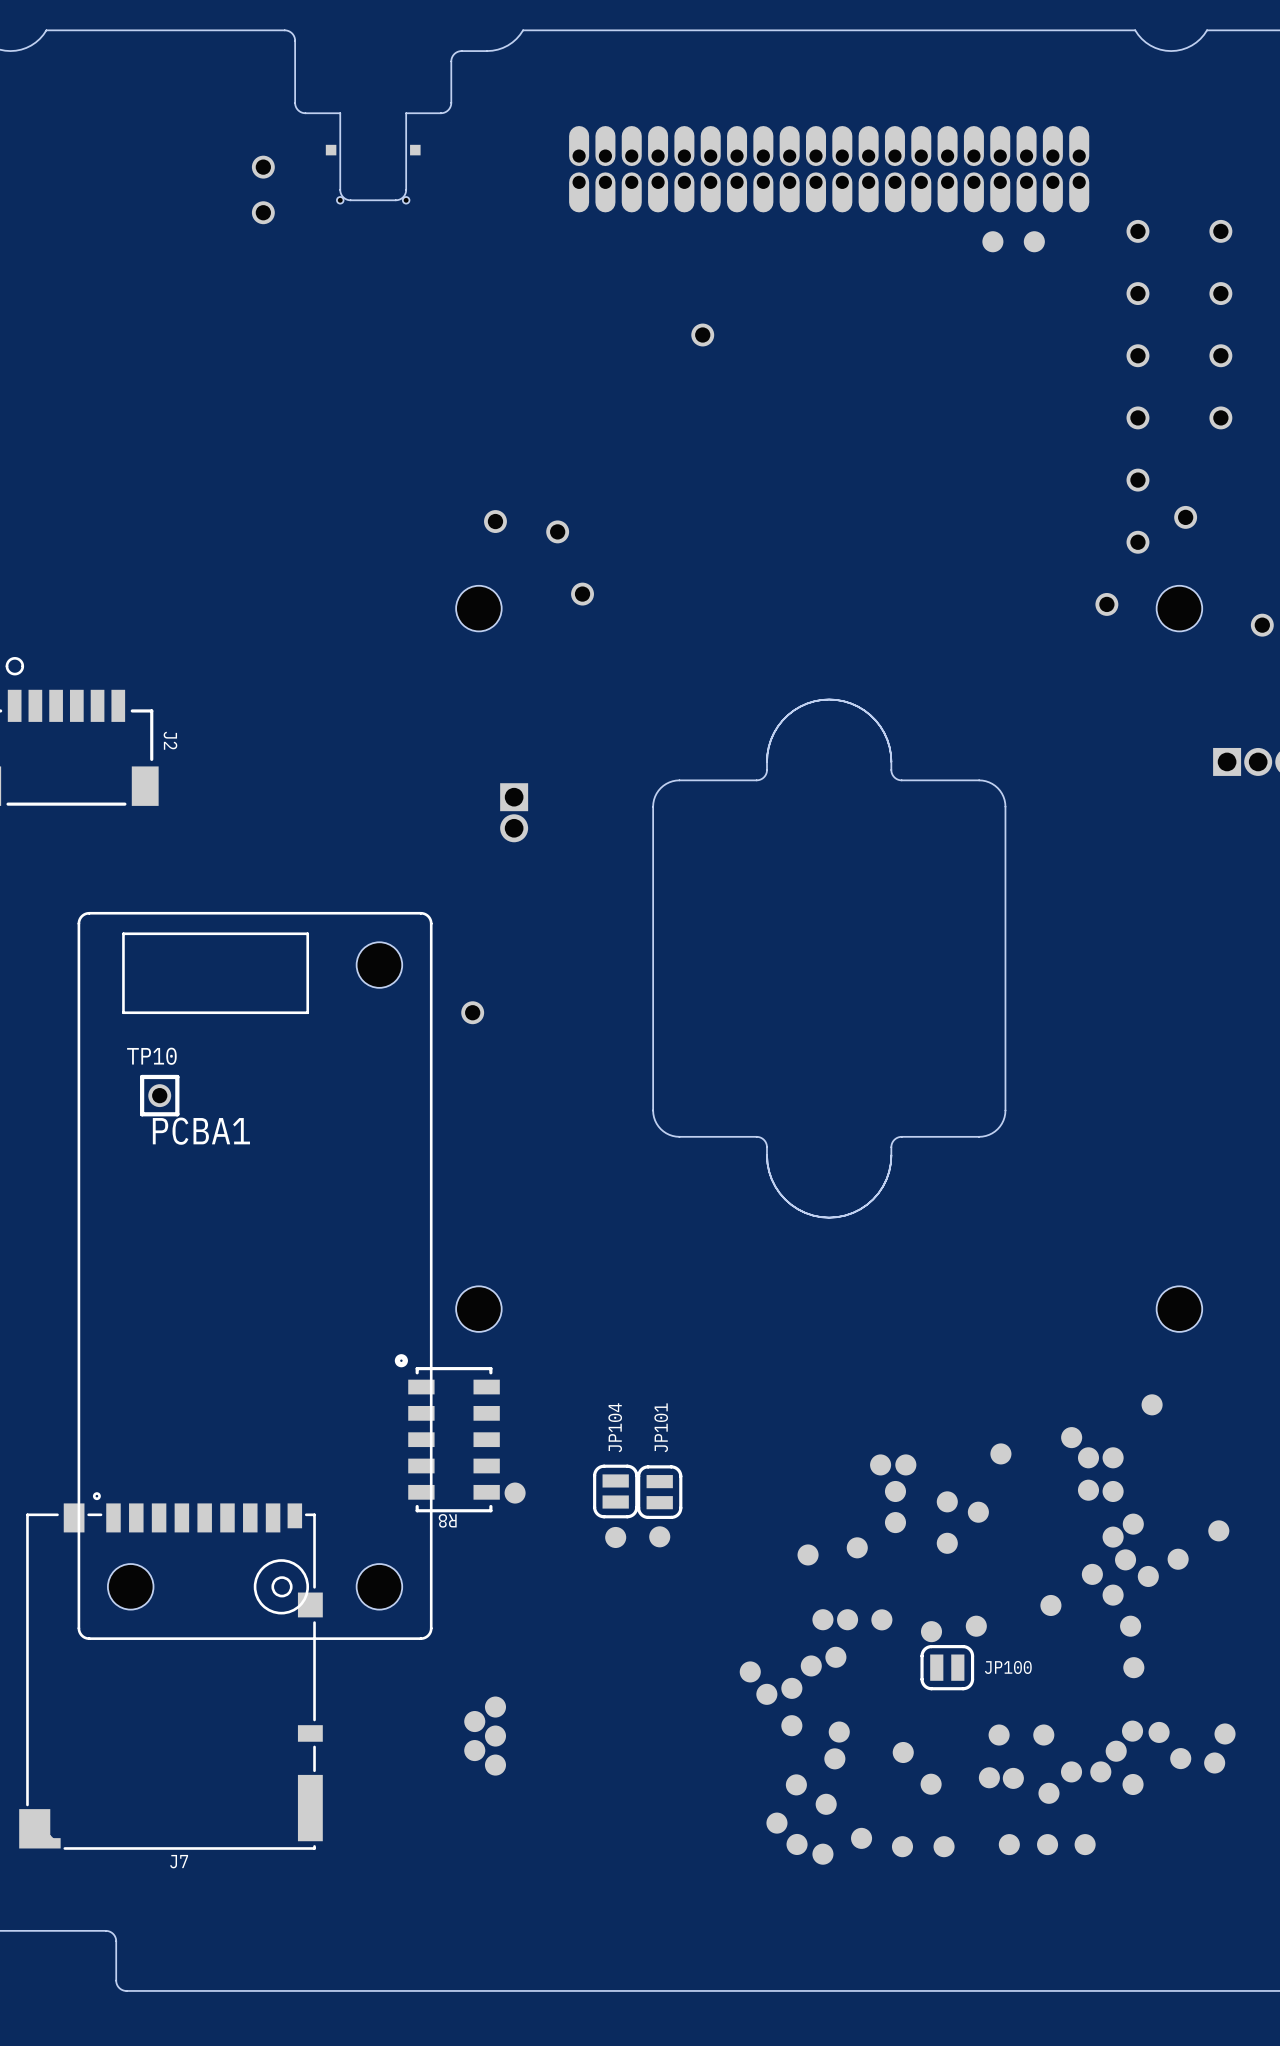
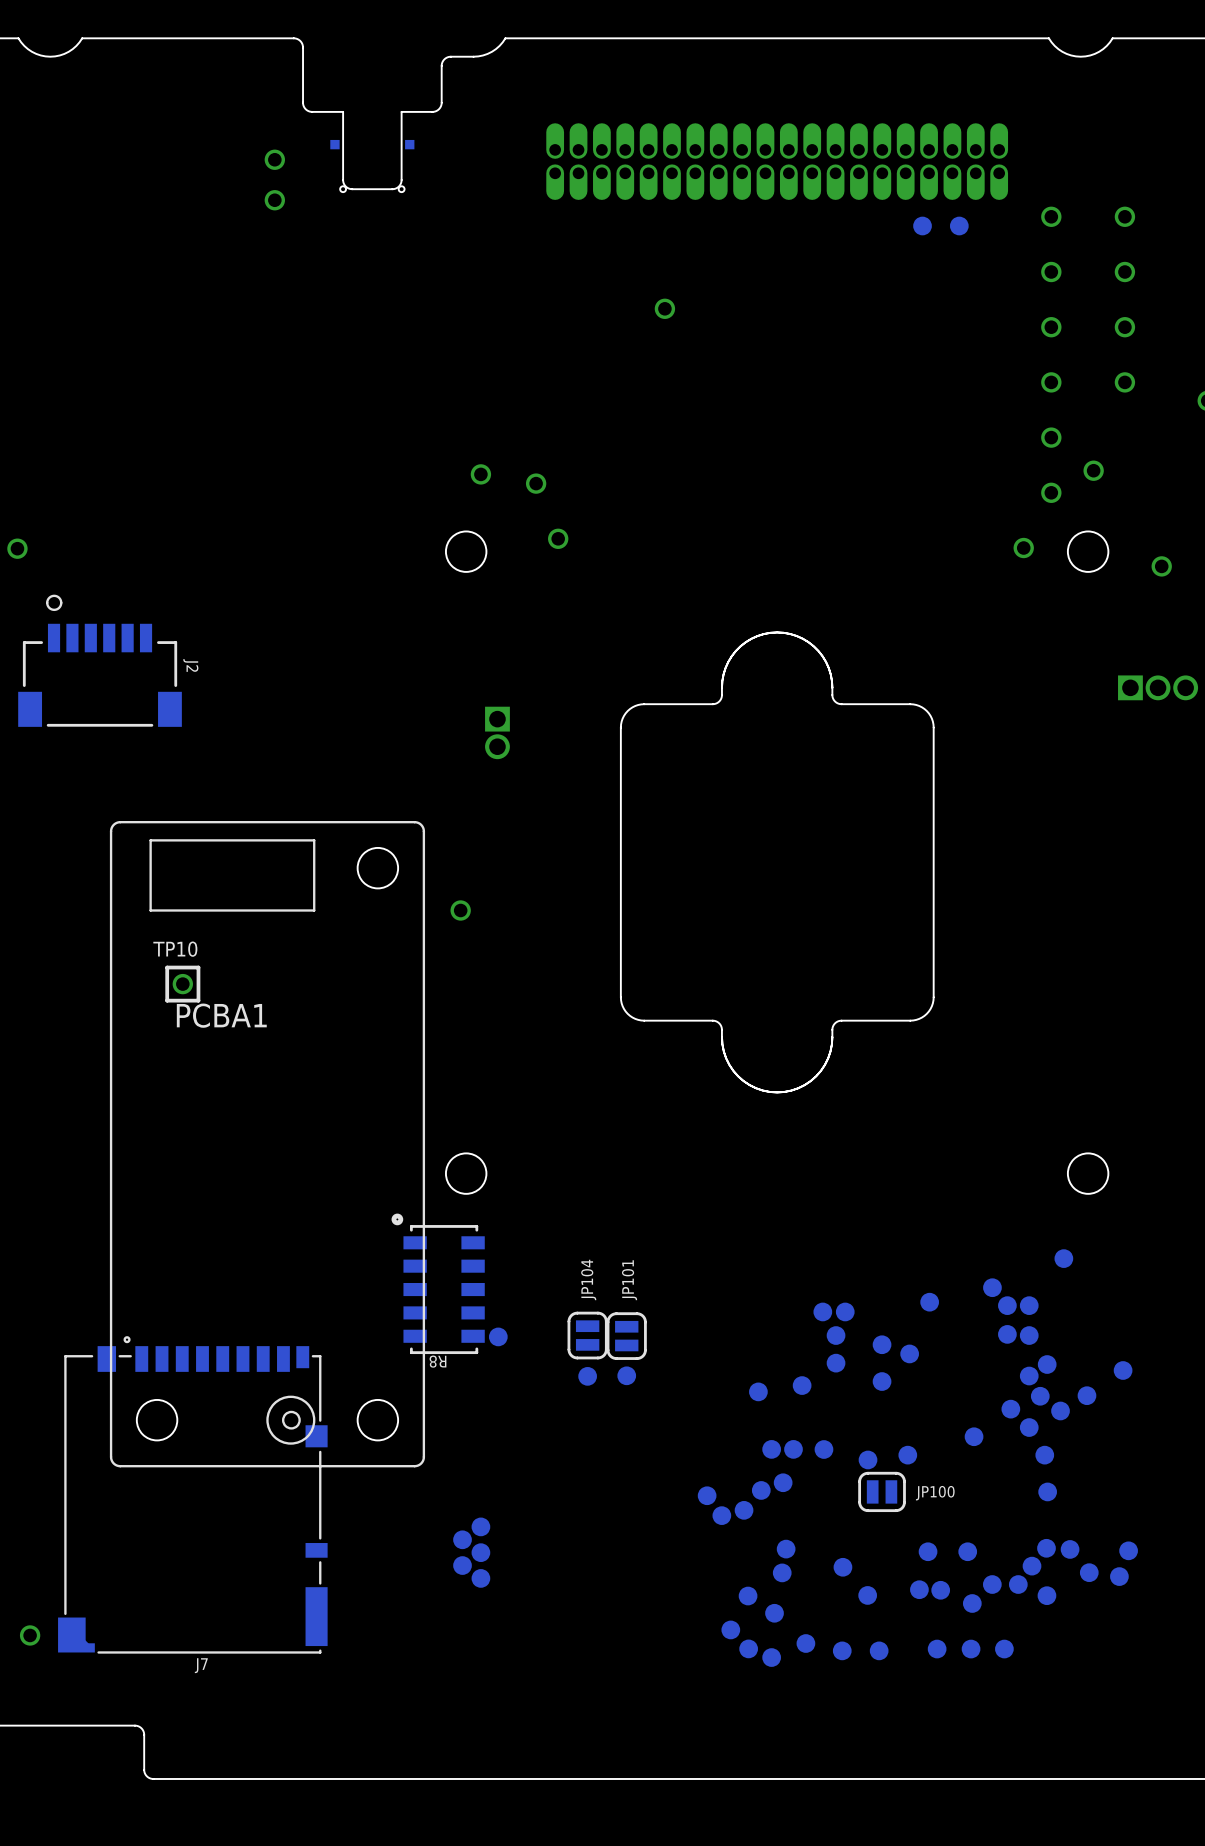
part: (791, 1725) -> none

